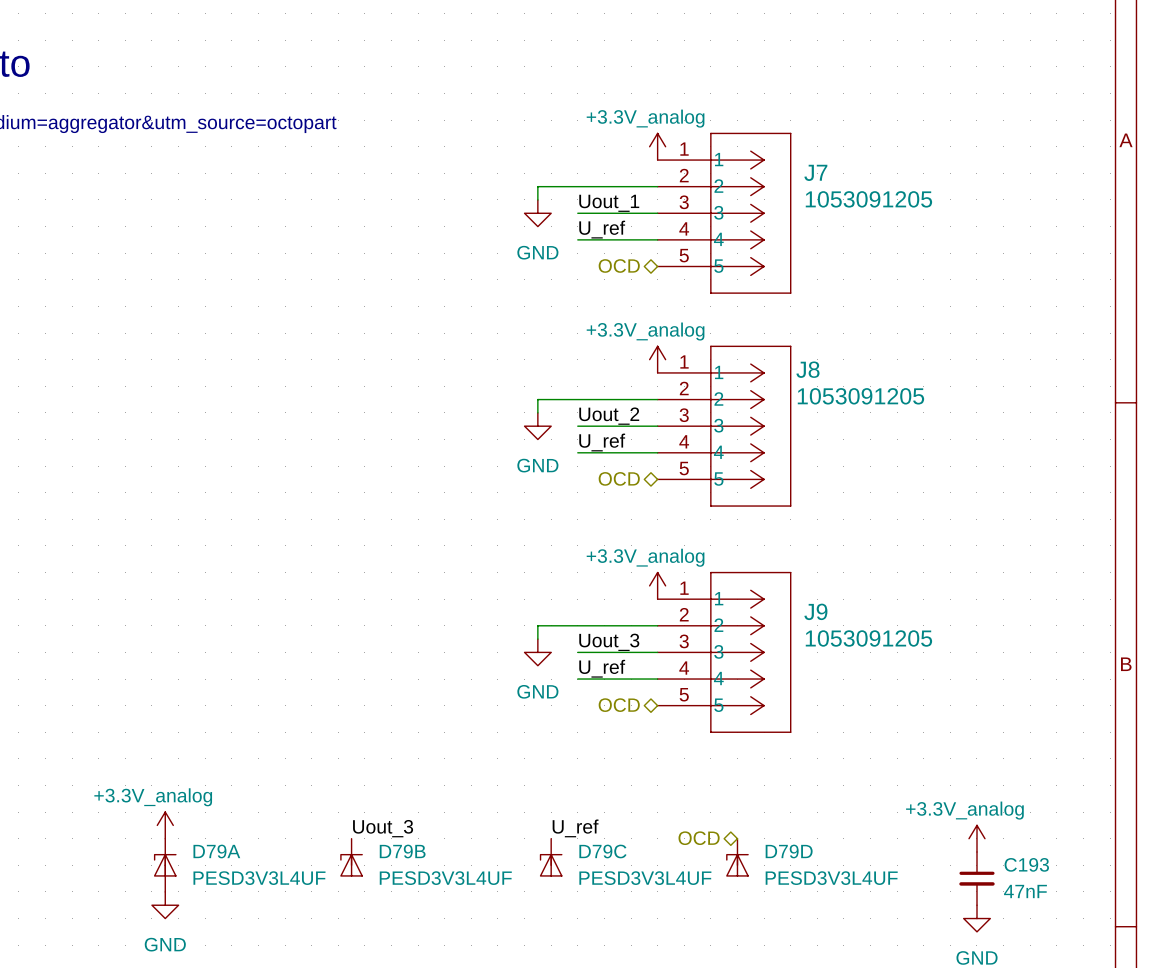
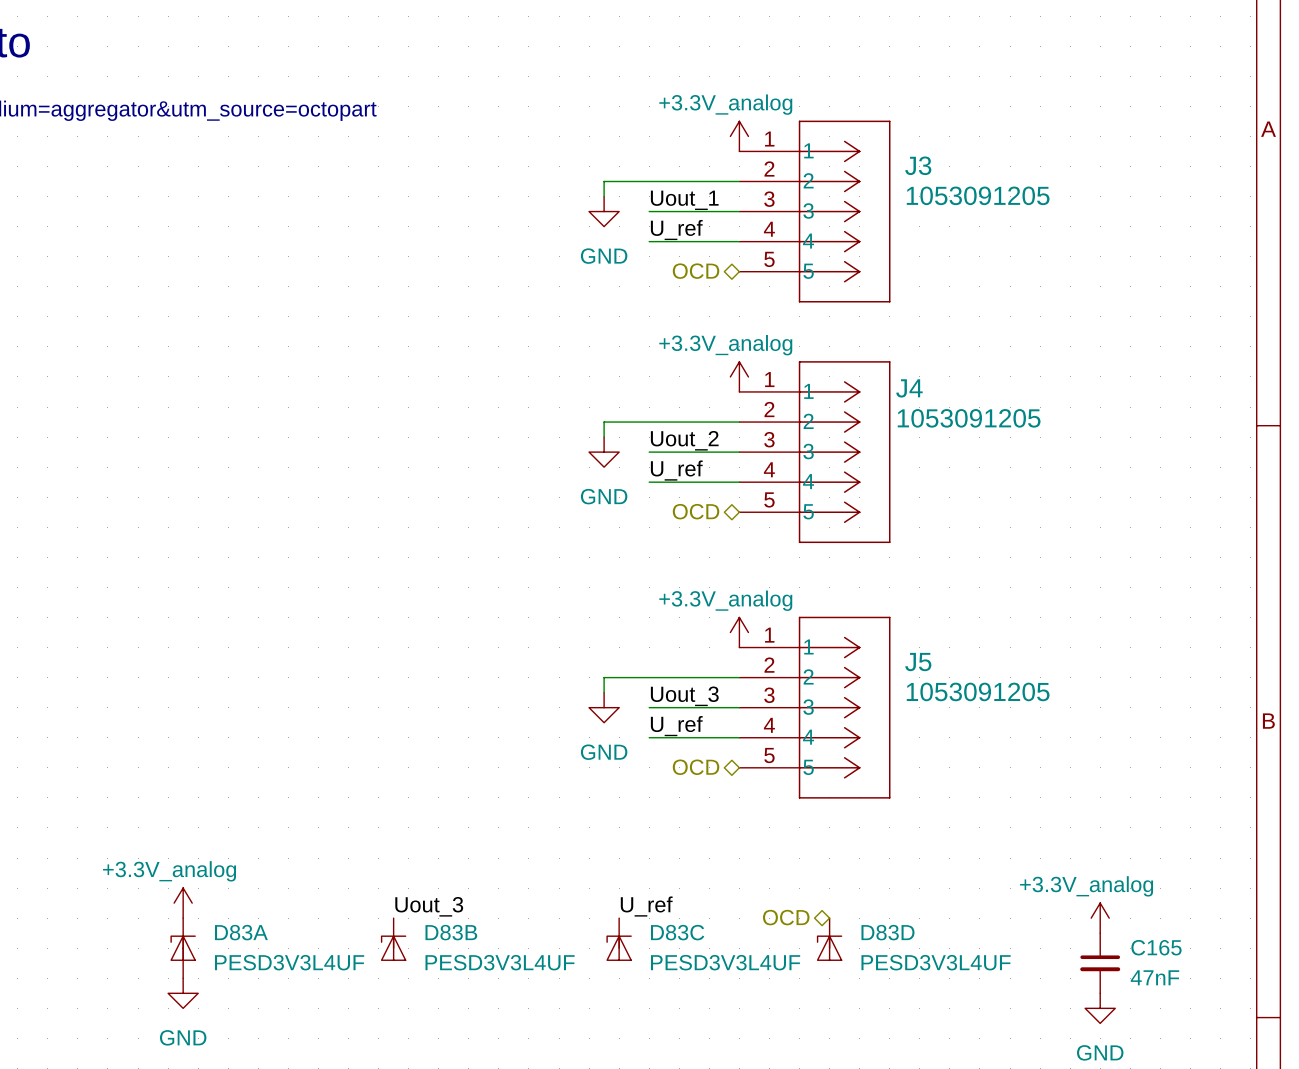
J7 name: J7 (815, 172) -> J3 (918, 165)
J8 name: J8 (807, 369) -> J4 (909, 388)
J9 name: J9 (815, 611) -> J5 (918, 662)
D79A name: D79A (216, 851) -> D83A (241, 932)
D79B name: D79B (402, 851) -> D83B (451, 932)
D79C name: D79C (602, 851) -> D83C (677, 932)
D79D name: D79D (789, 851) -> D83D (887, 932)
C193 name: C193 (1026, 864) -> C165 (1156, 947)

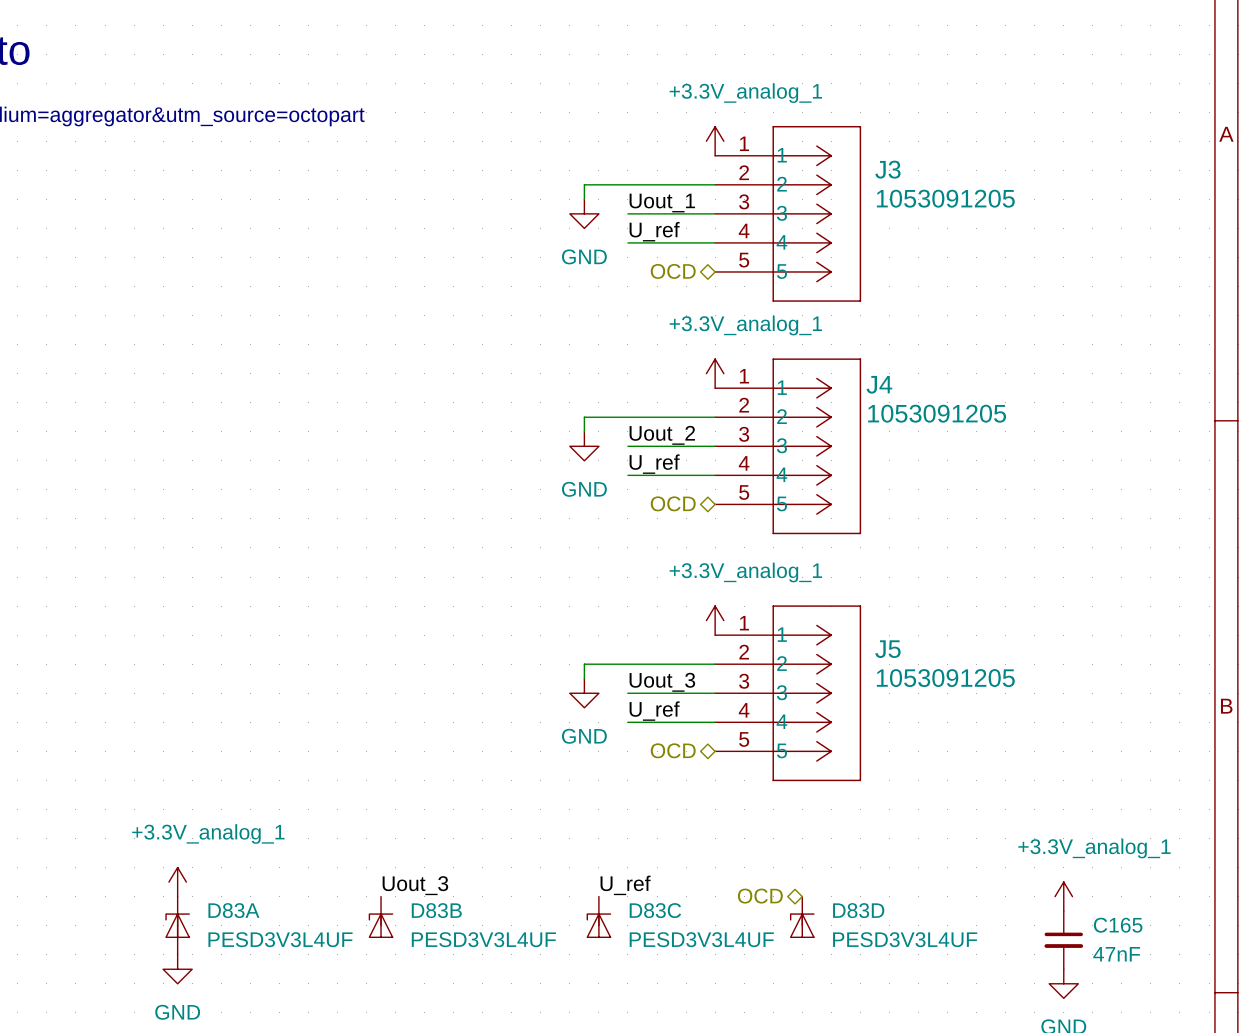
power symbol: +3.3V_analog (739, 136) -> +3.3V_analog_1 (715, 141)
power symbol: +3.3V_analog (739, 376) -> +3.3V_analog_1 (715, 373)
power symbol: +3.3V_analog (739, 632) -> +3.3V_analog_1 (715, 620)
power symbol: +3.3V_analog (183, 903) -> +3.3V_analog_1 (177, 882)
power symbol: +3.3V_analog (1100, 918) -> +3.3V_analog_1 (1063, 896)

